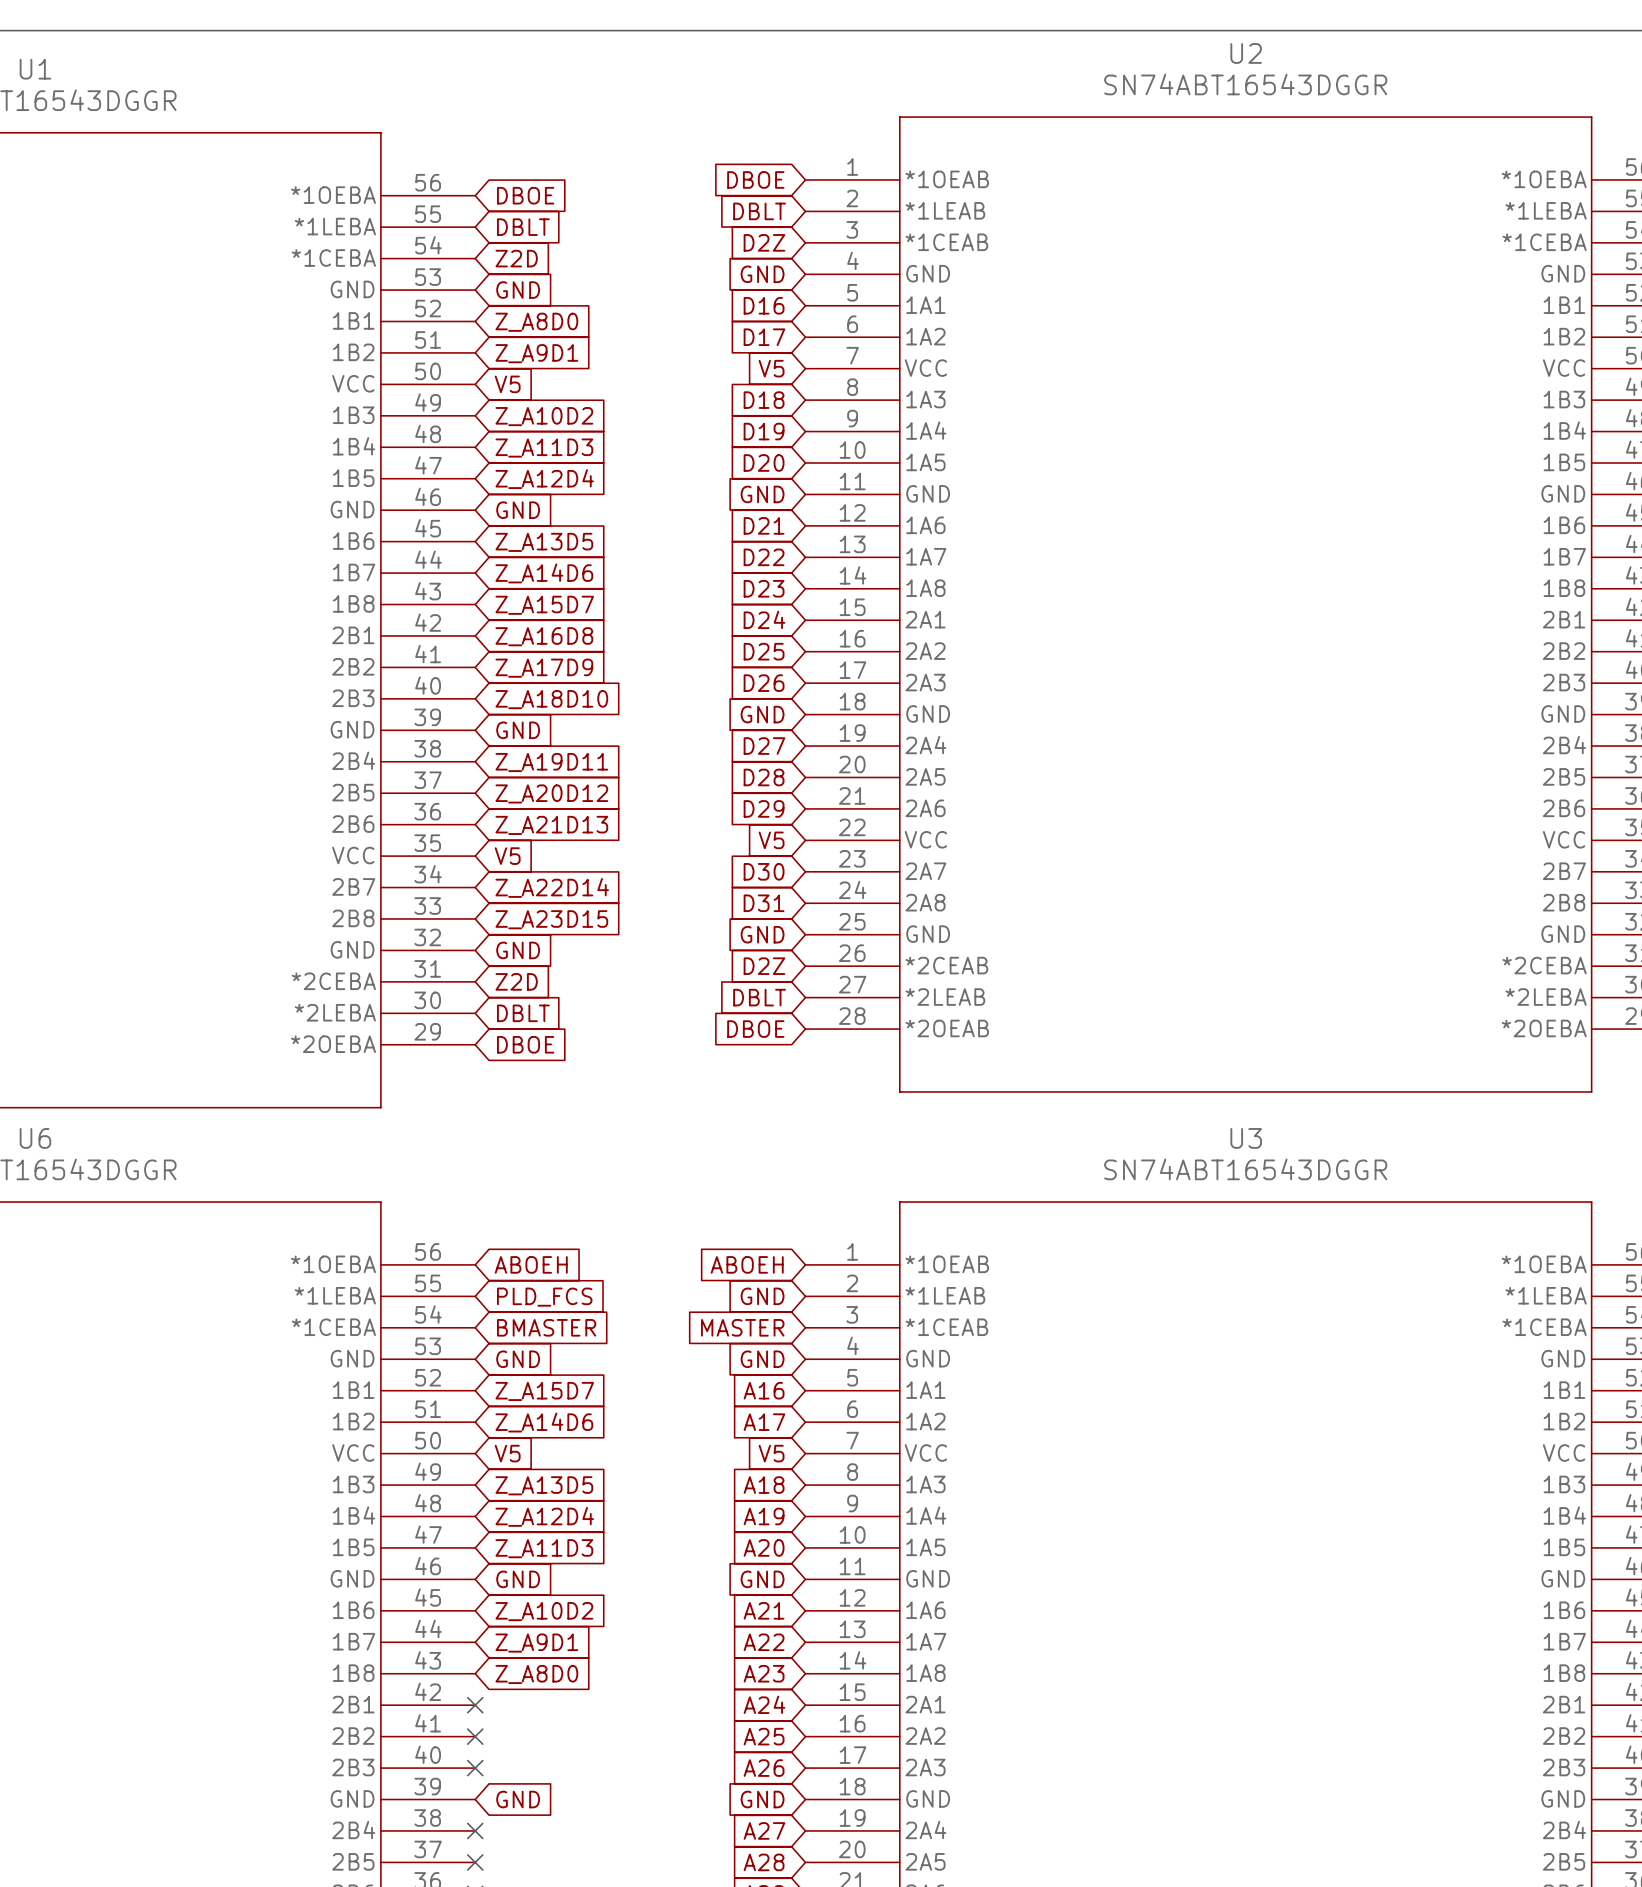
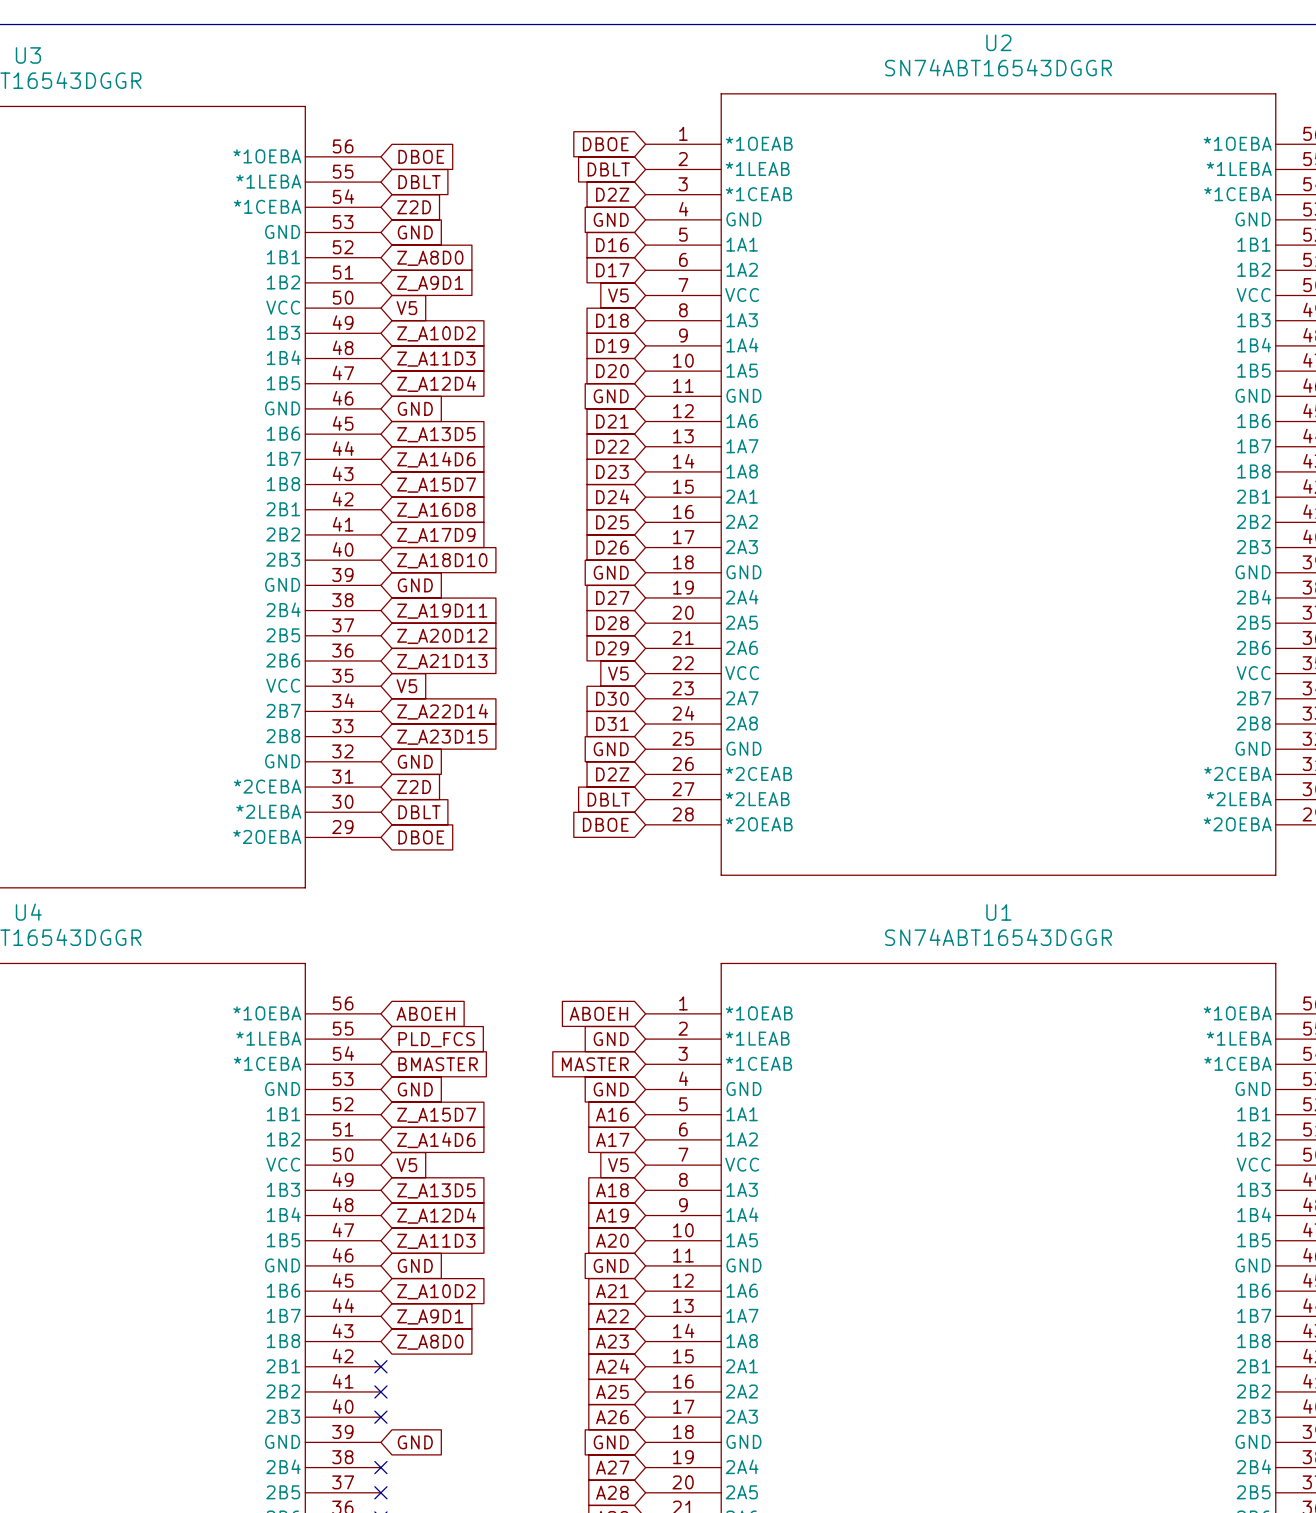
U1 name: U1 (35, 69) -> U3 (28, 55)
U6 name: U6 (35, 1138) -> U4 (28, 912)
U3 name: U3 (1246, 1138) -> U1 (998, 912)

